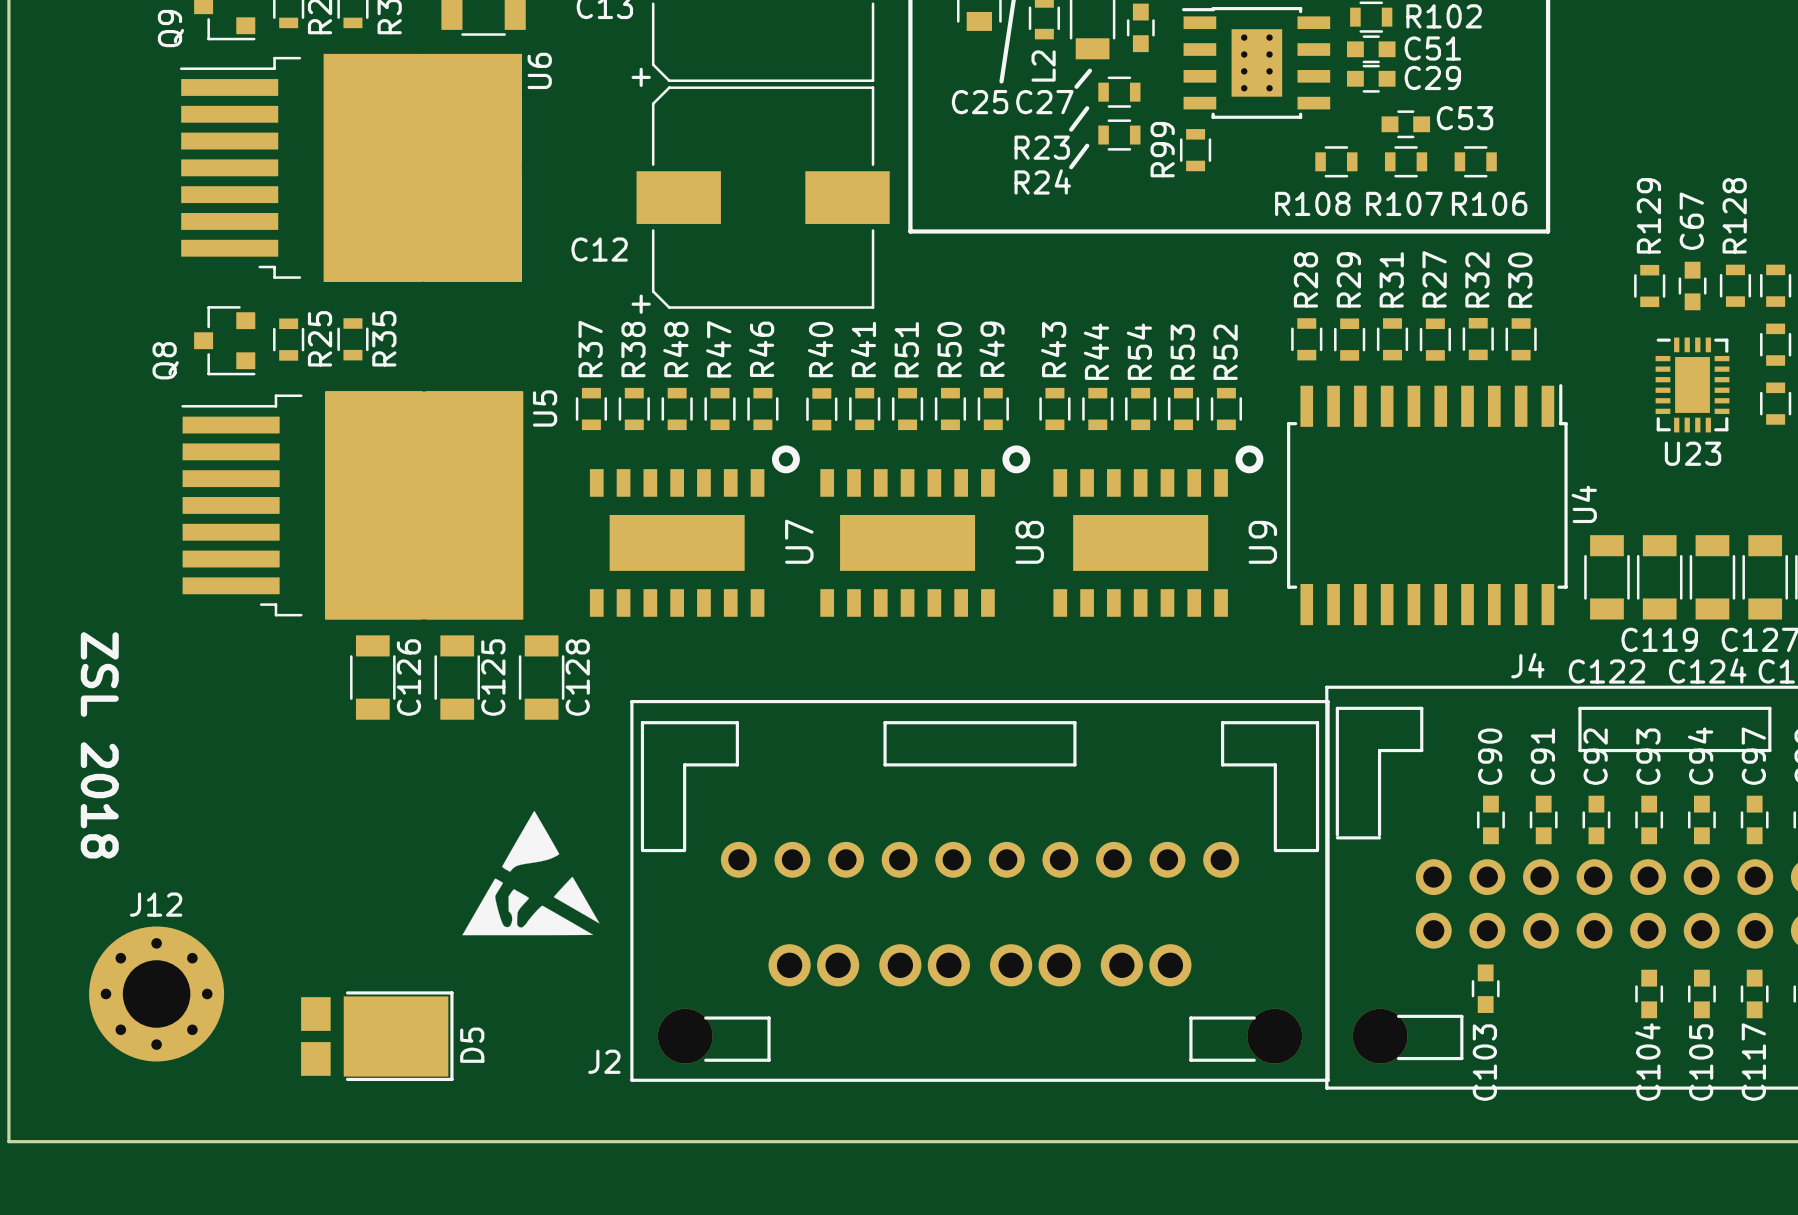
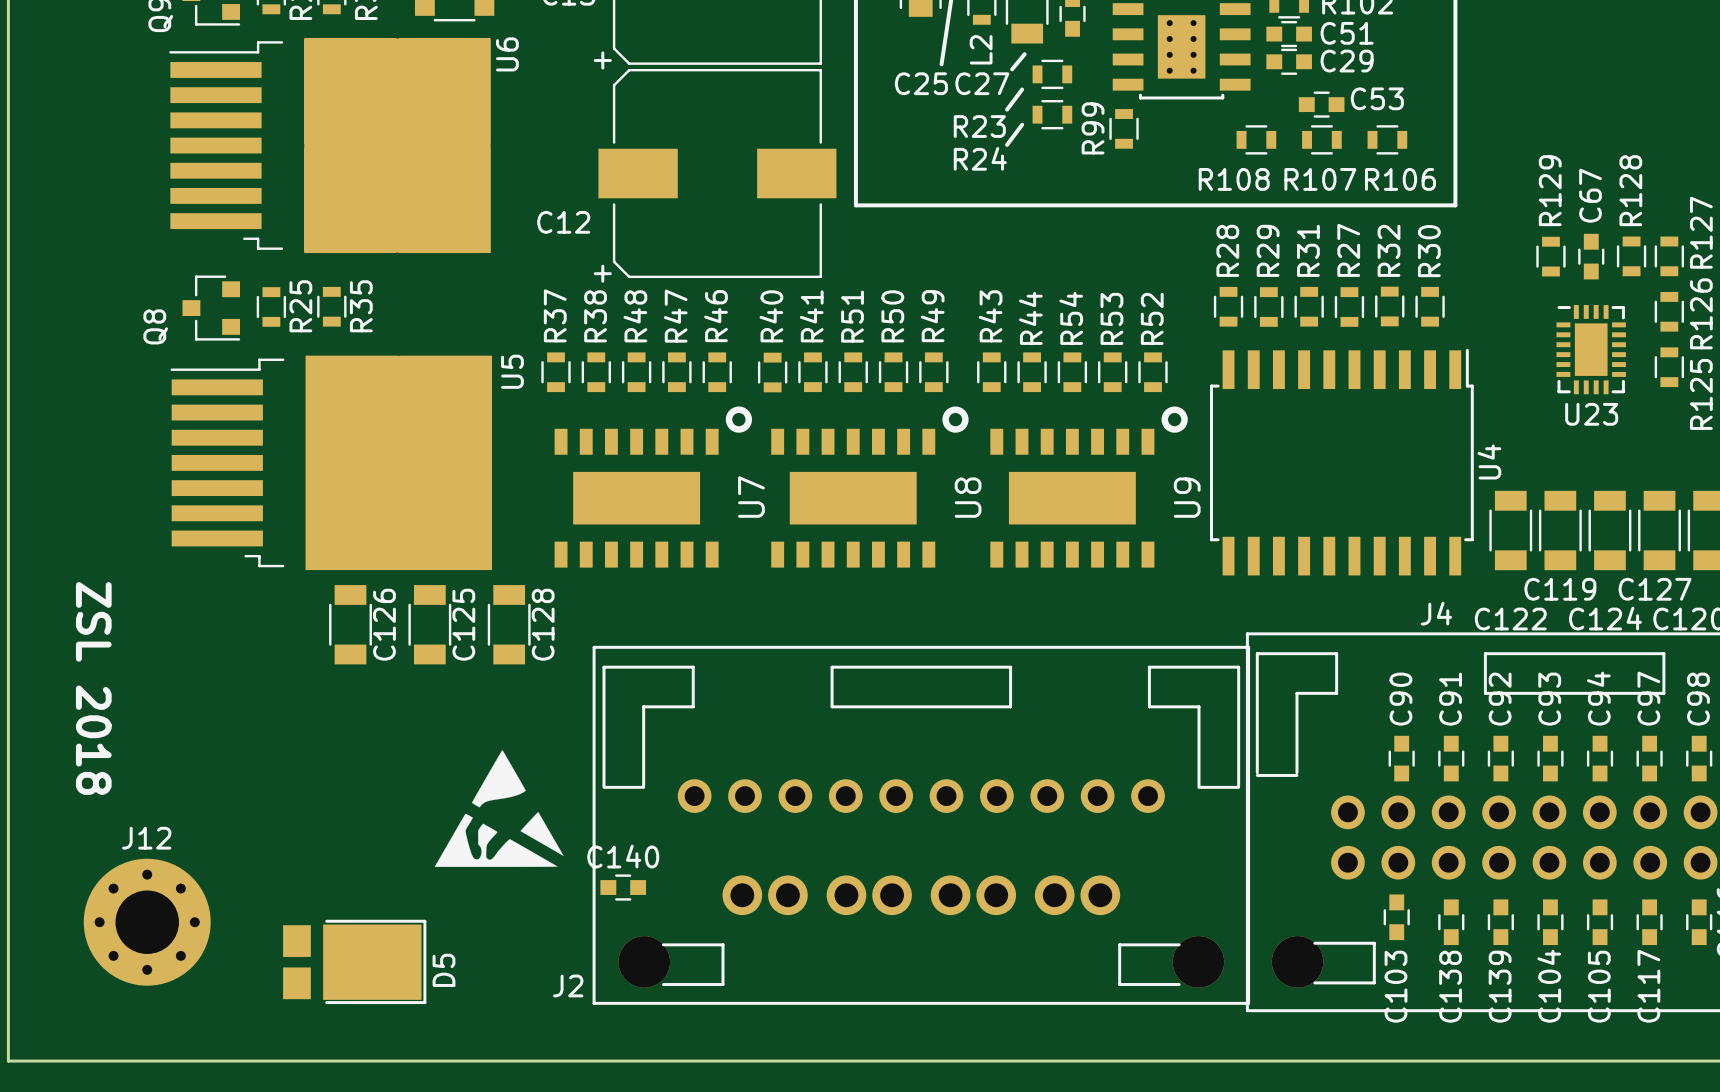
C140: none -> (623, 887)
C138: none -> (1451, 922)
C139: none -> (1500, 922)

